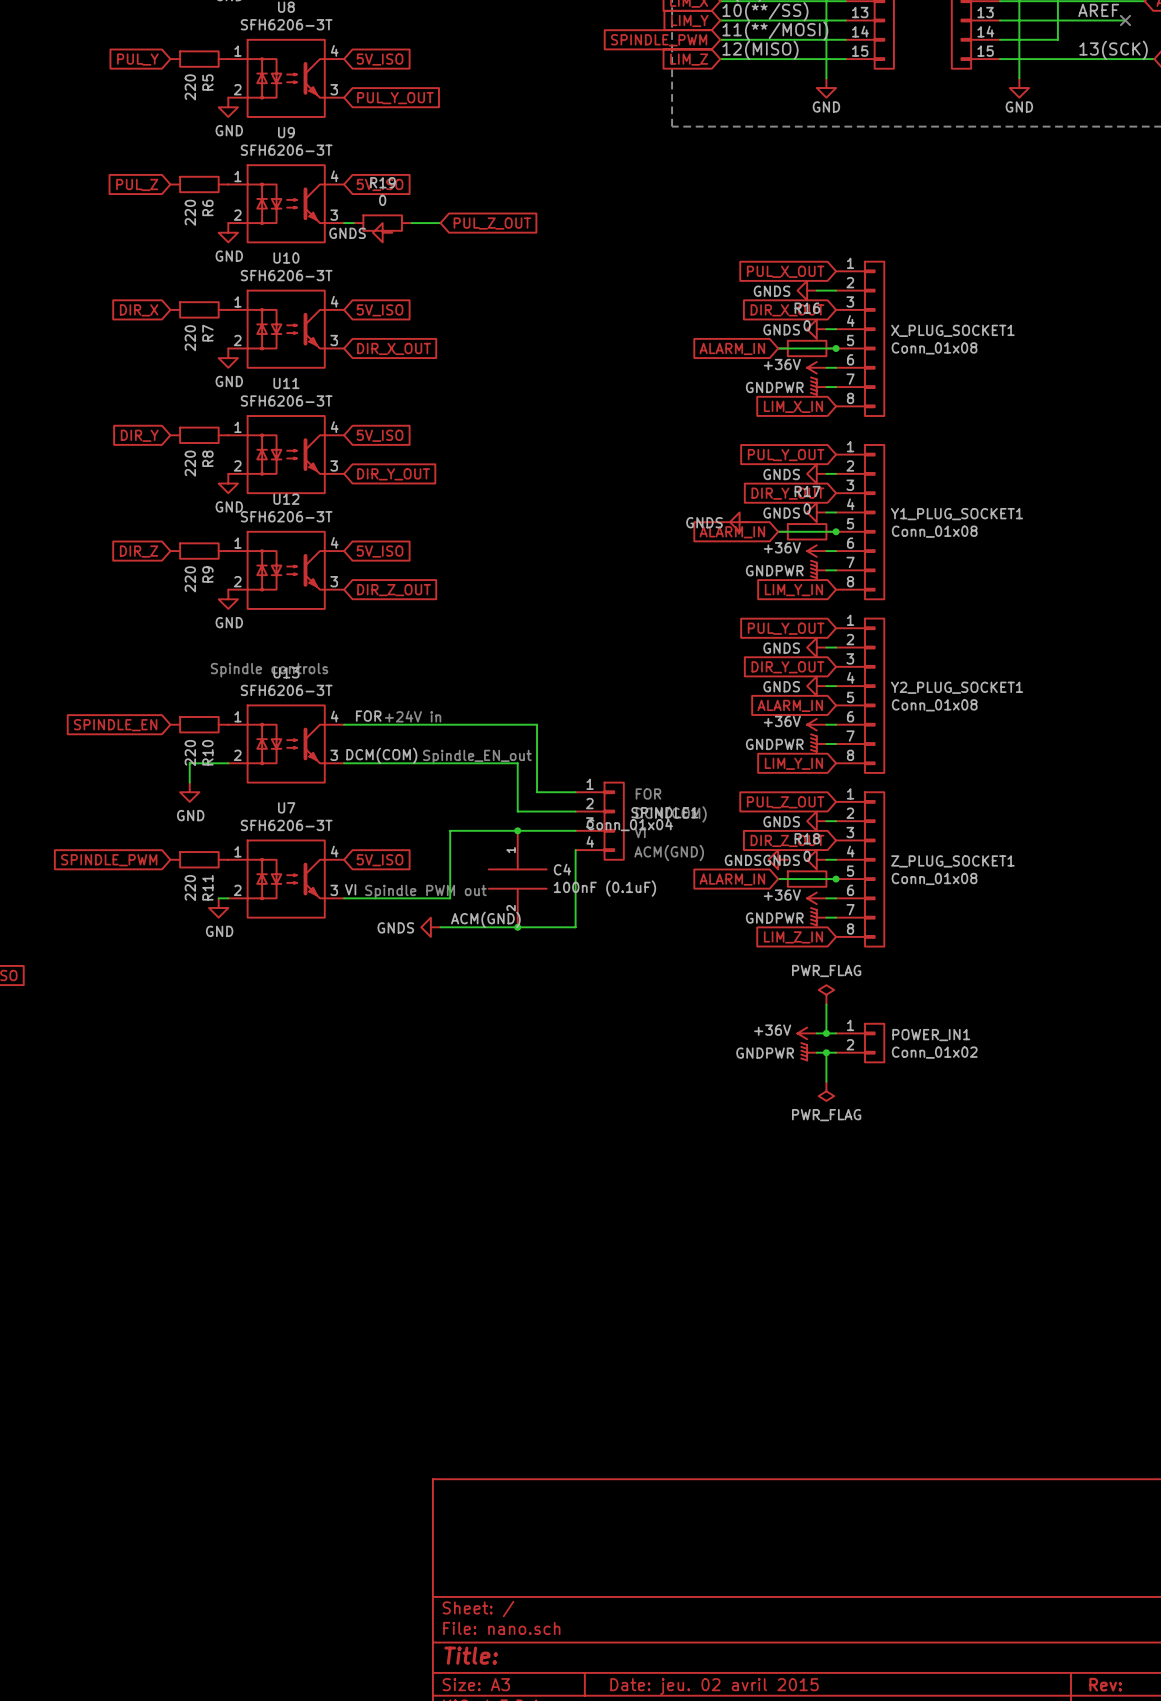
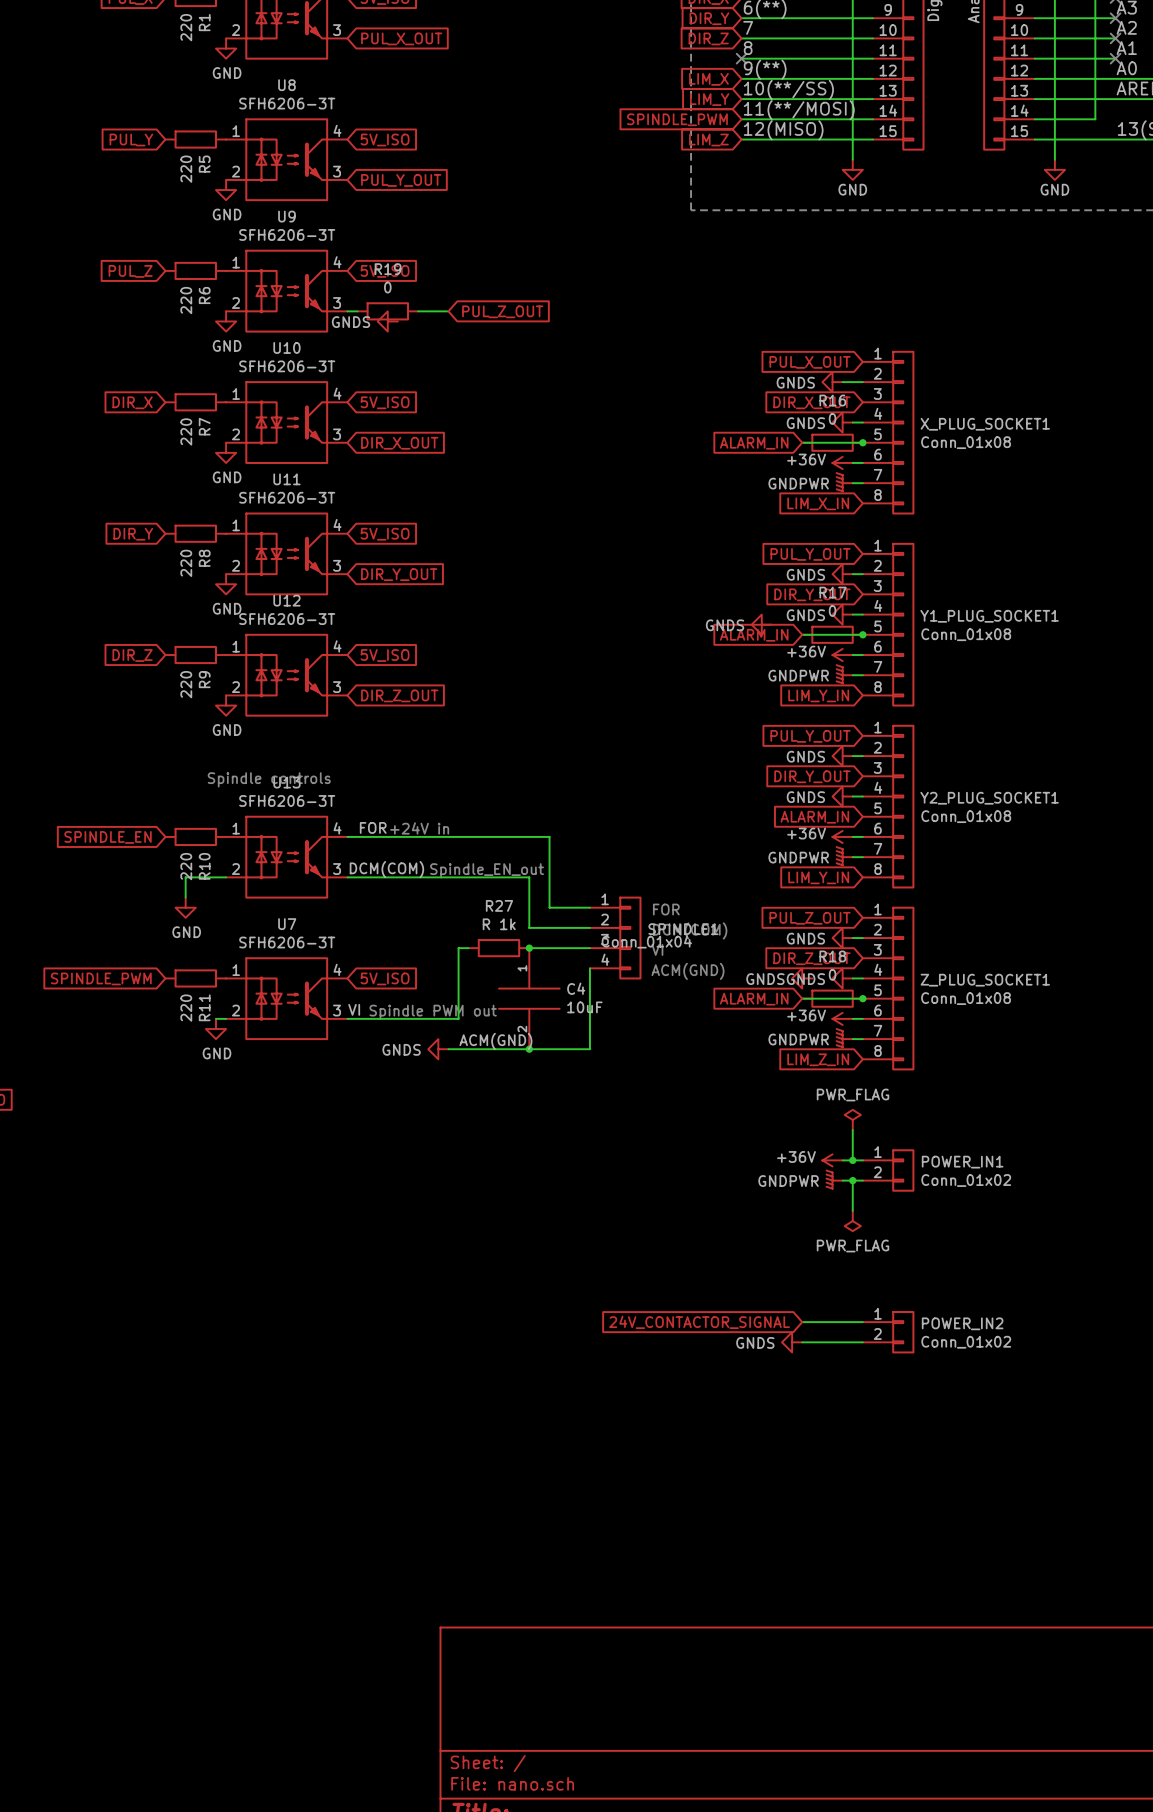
wire: (459, 830) (517, 830) -> none
R27: none -> R 1k (498, 948)
C4 value: 100nF (0.1uF) (604, 888) -> 10uF (584, 1007)
global label: none -> 24V_CONTACTOR_SIGNAL (699, 1322)
wire: none -> (802, 1322) (862, 1322)
POWER_IN2: none -> Conn_01x02 (888, 1332)
power symbol: none -> GNDS (792, 1342)
wire: none -> (802, 1342) (862, 1342)

